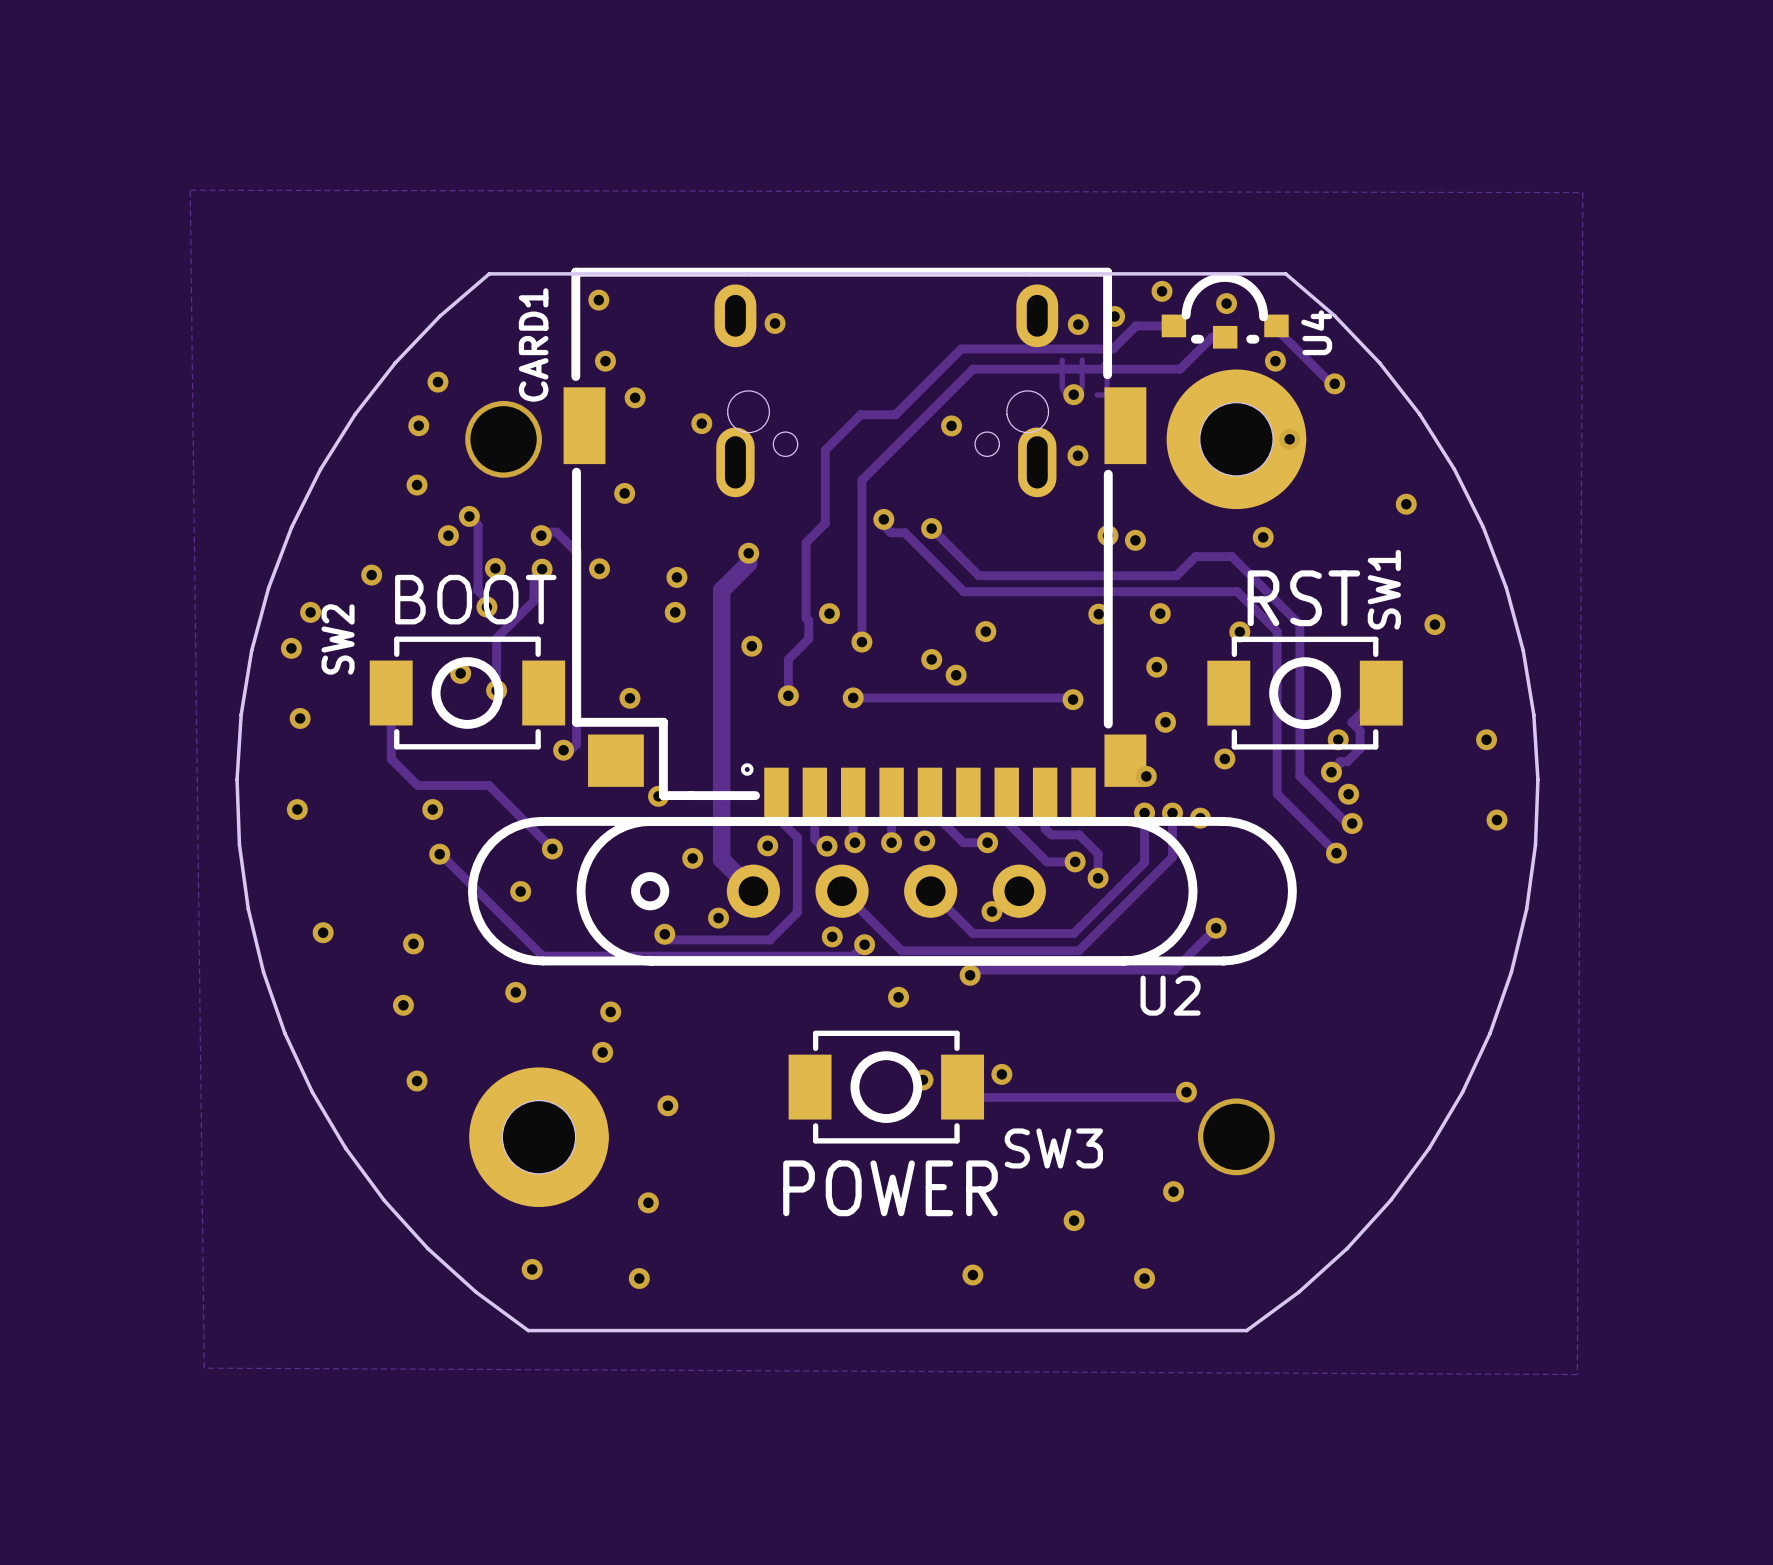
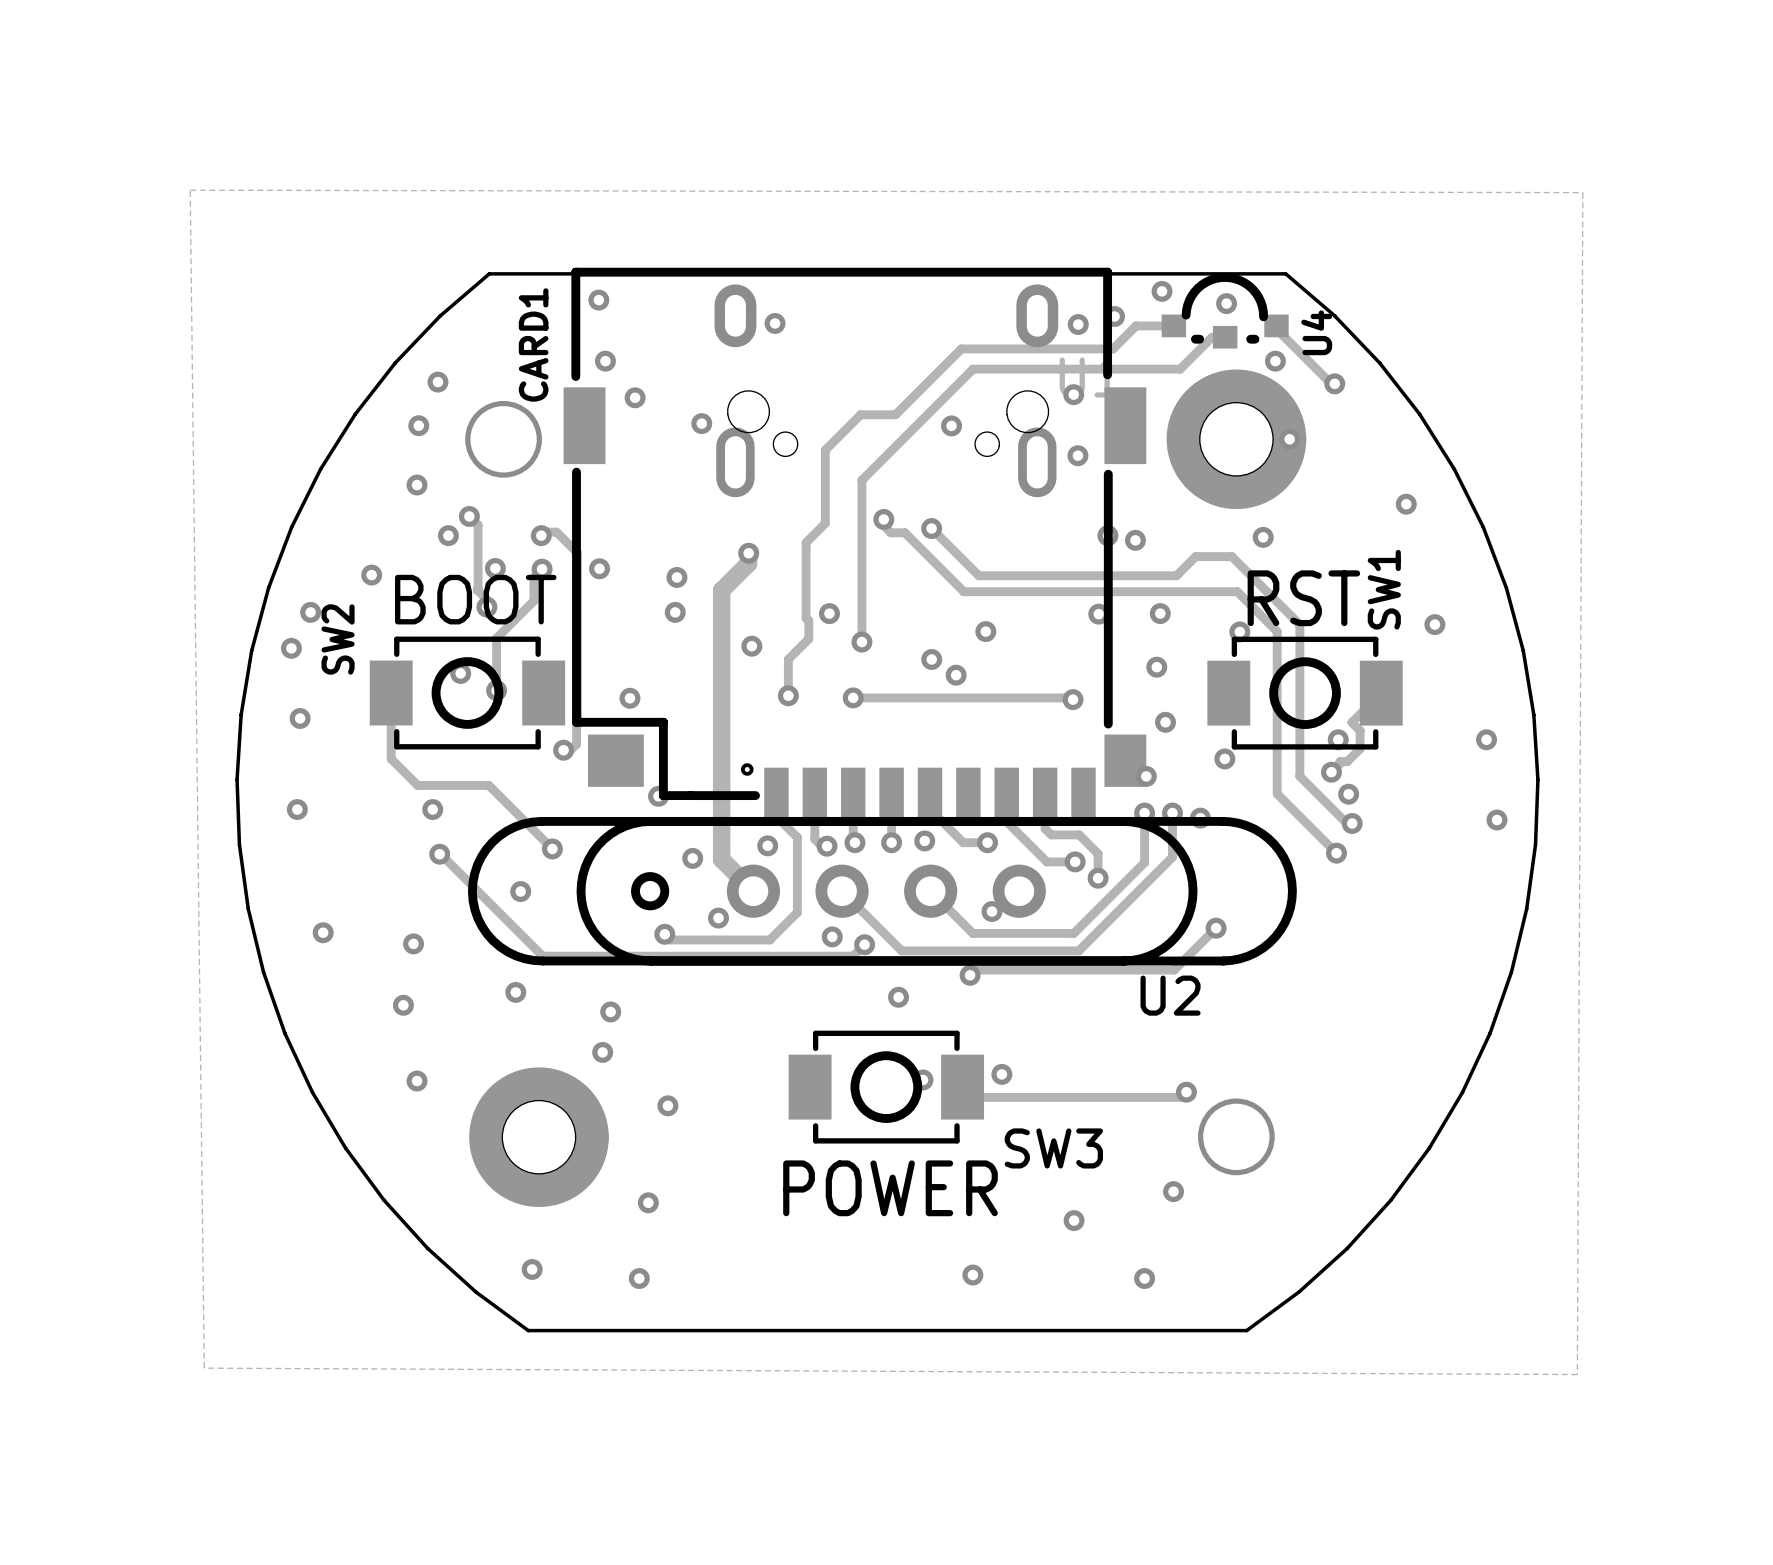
via: (624, 493) -> none

